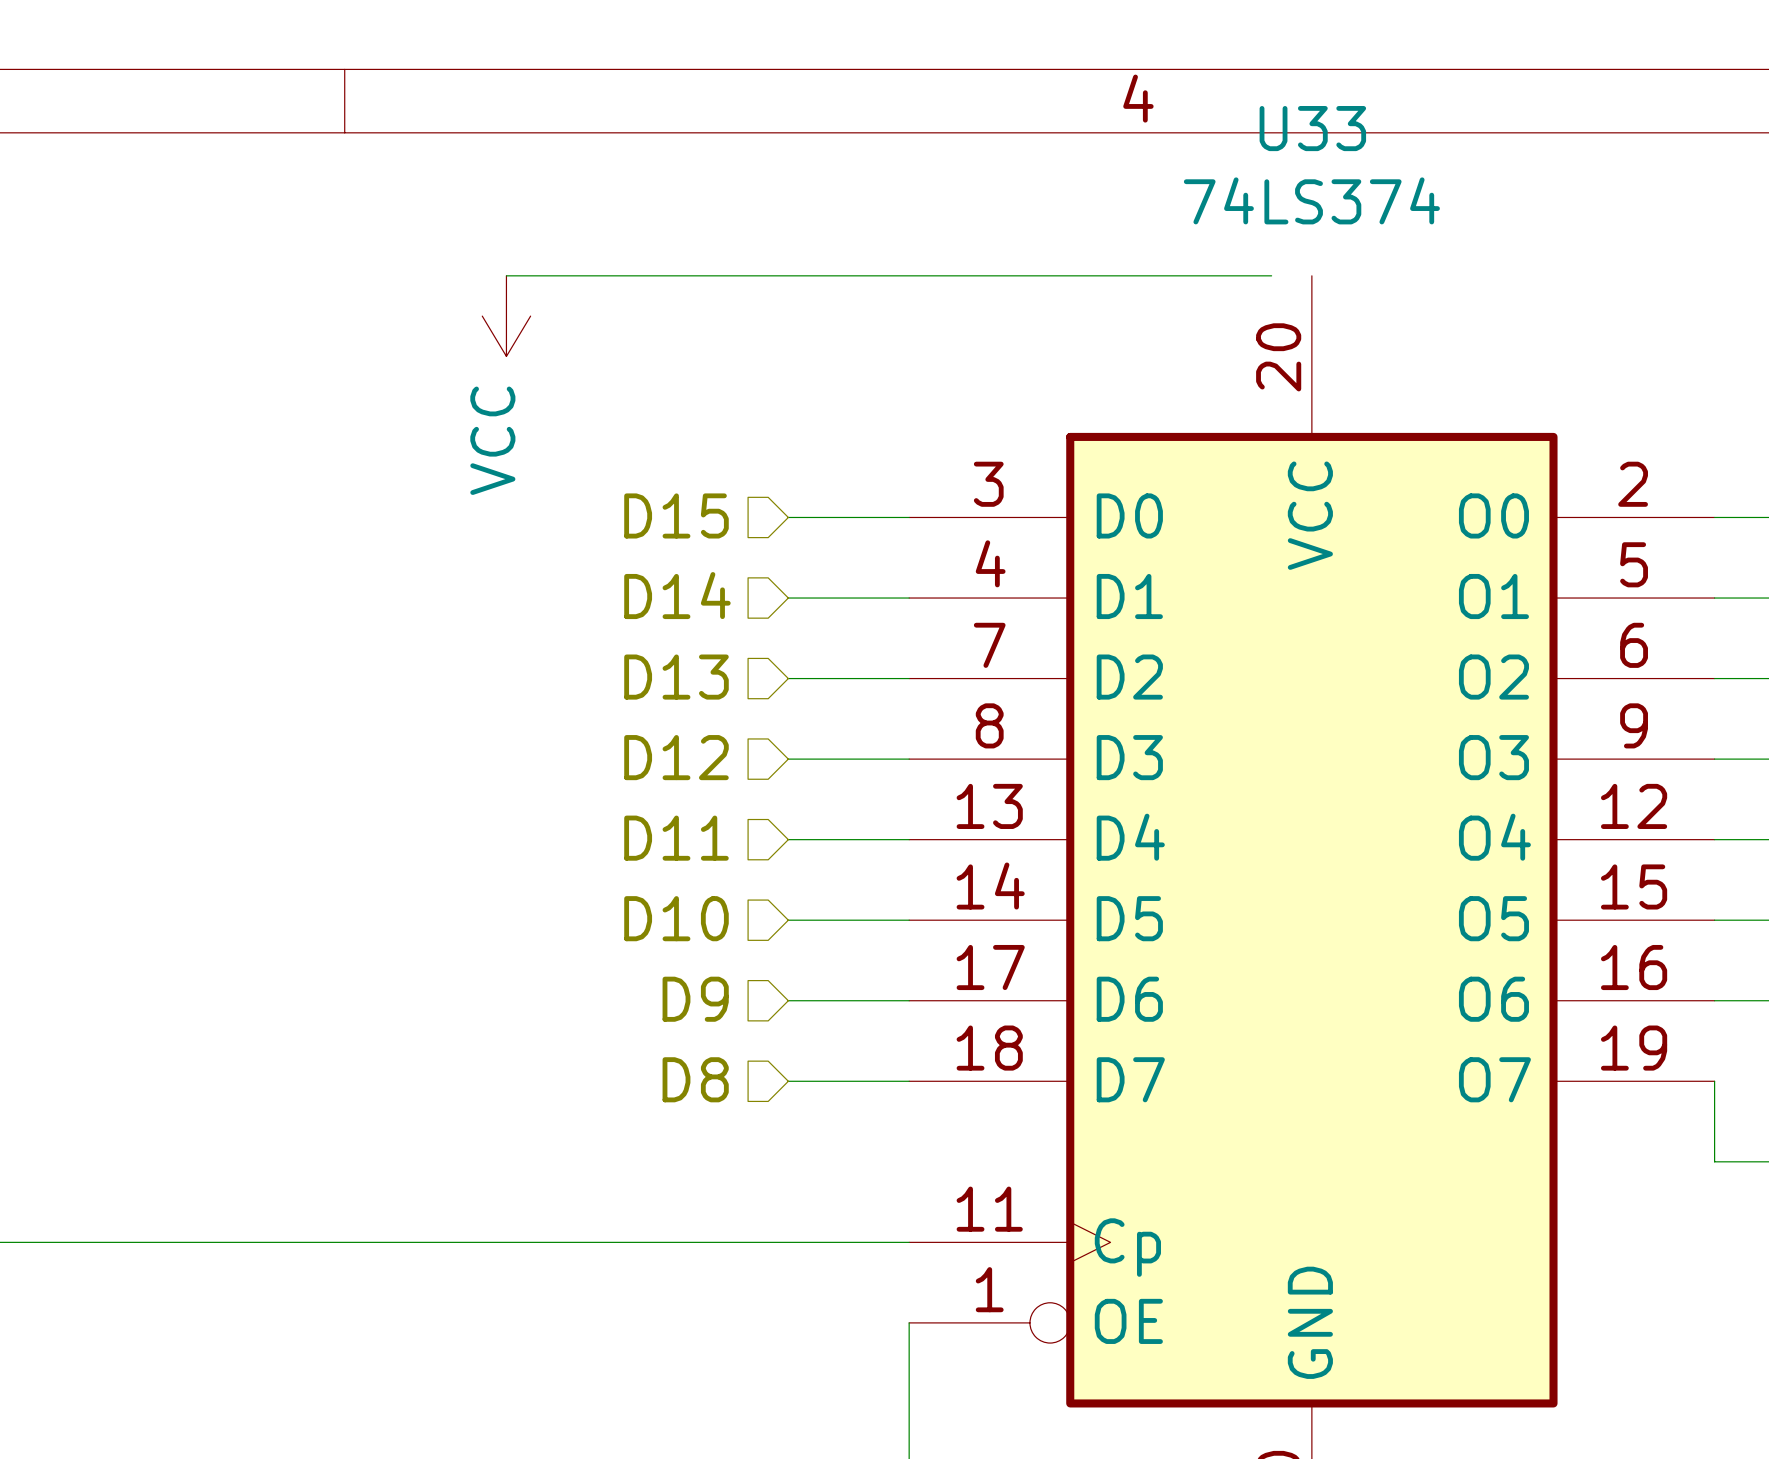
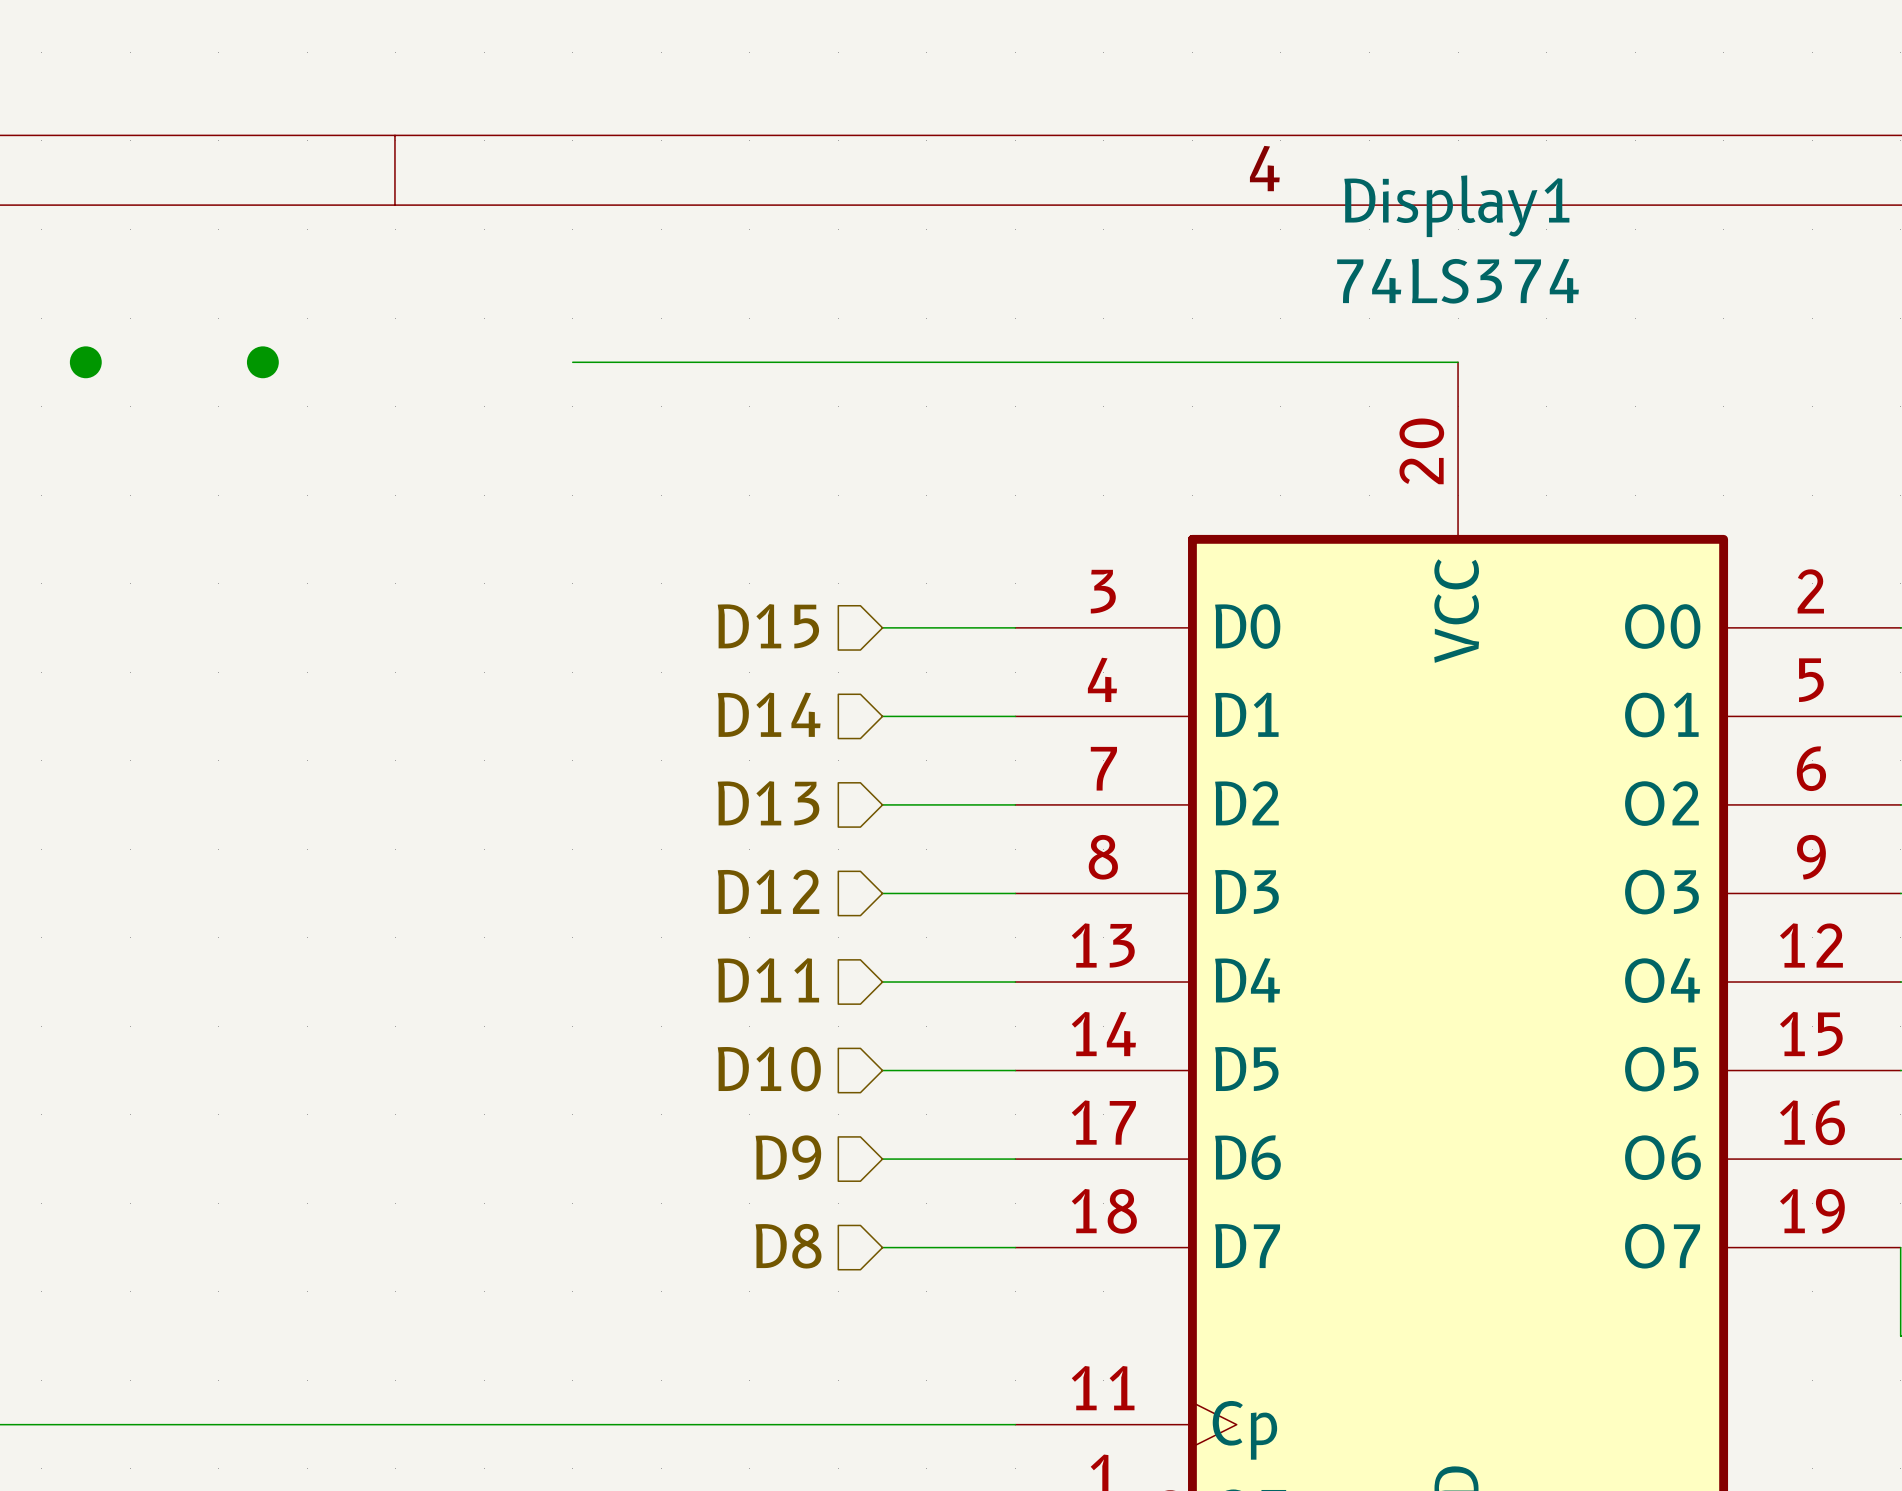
U33 name: U33 (1312, 128) -> Display1 (1456, 206)
junction: none -> (85, 362)
junction: none -> (262, 362)
wire: none -> (1413, 362) (1458, 362)
power symbol: VCC (506, 316) -> none

